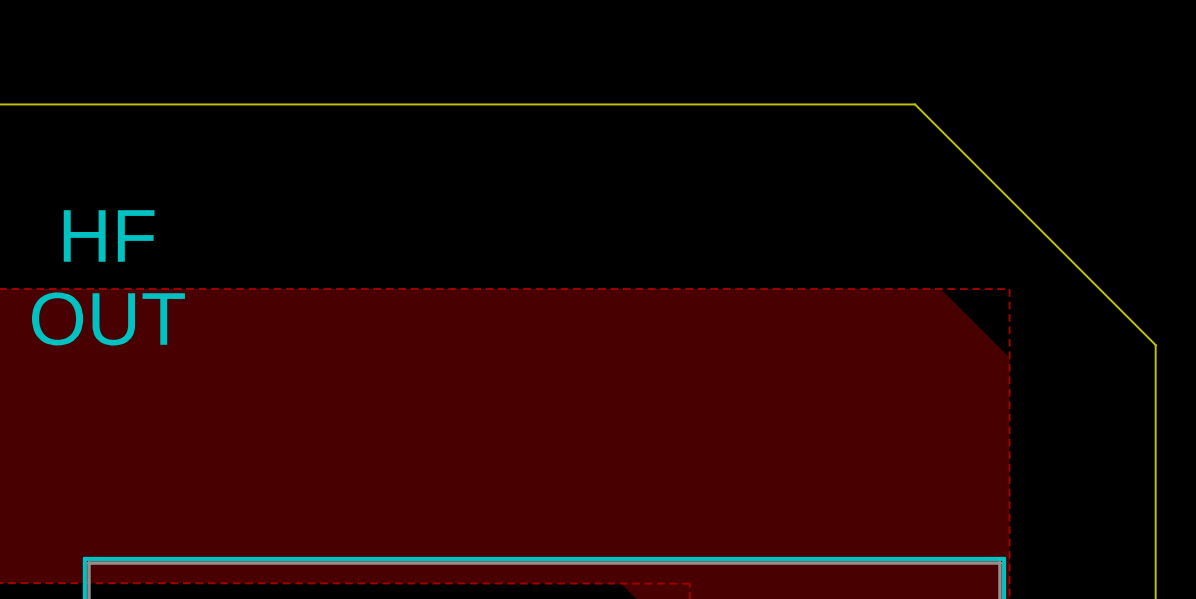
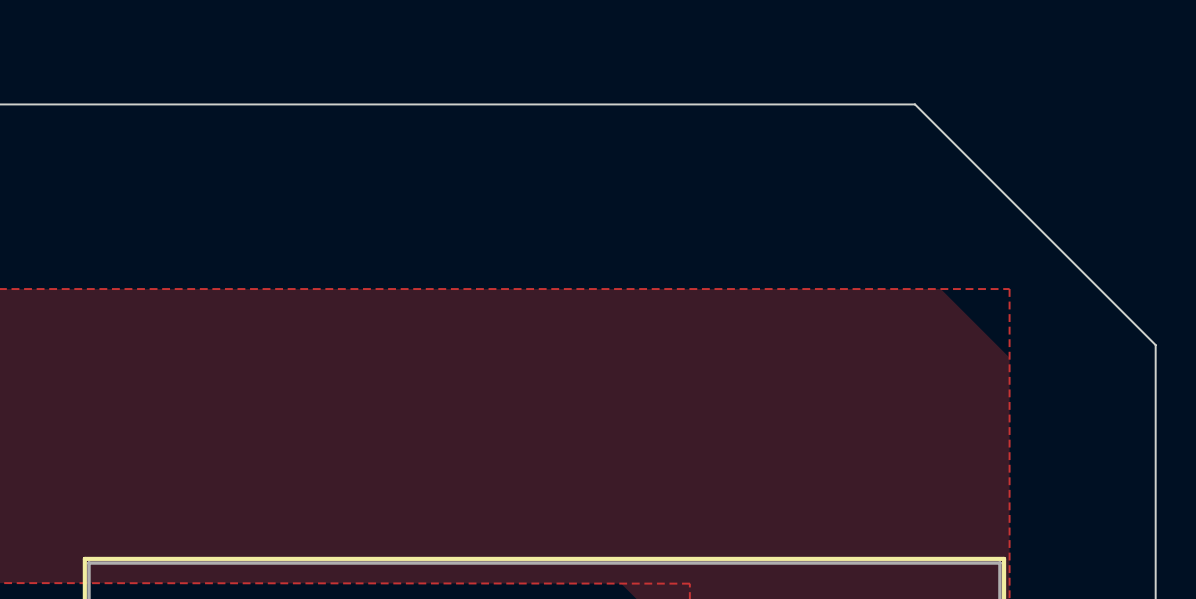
text: HF (109, 235) -> none
text: OUT (108, 318) -> none

